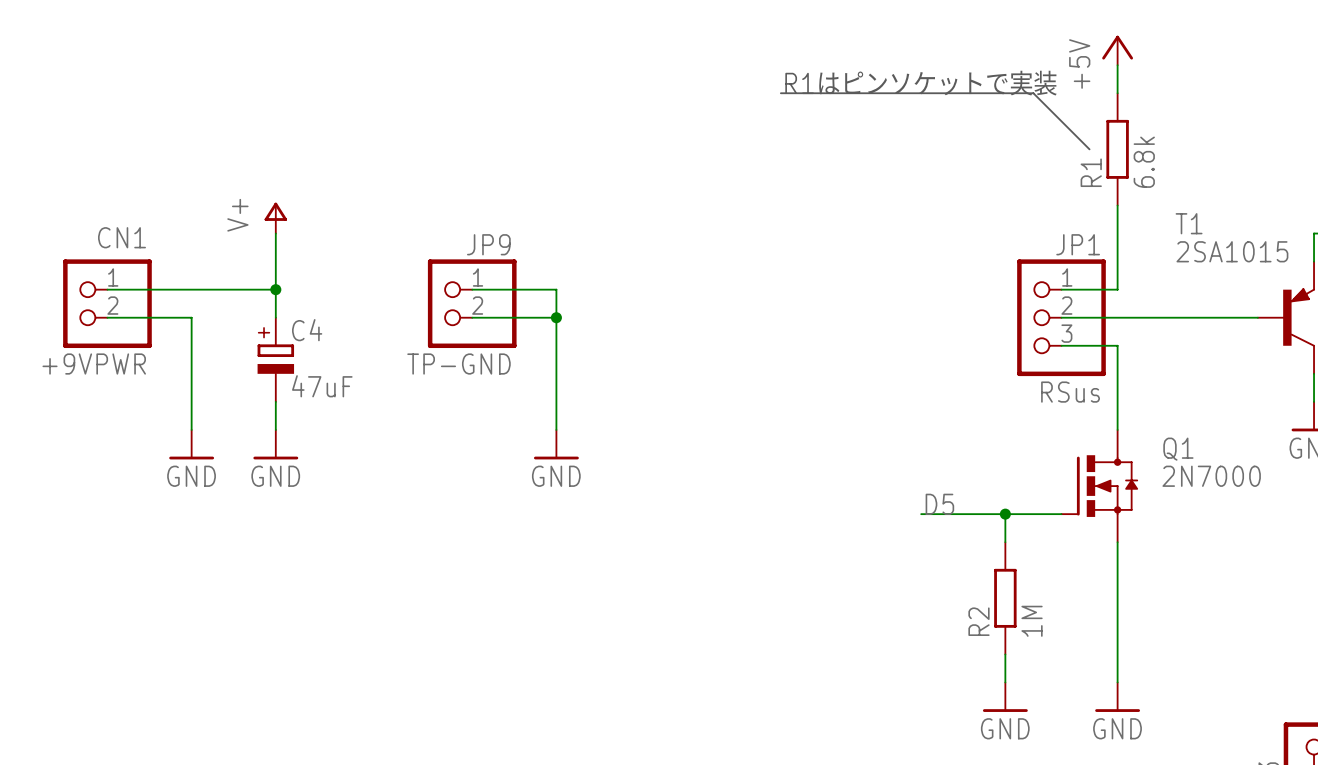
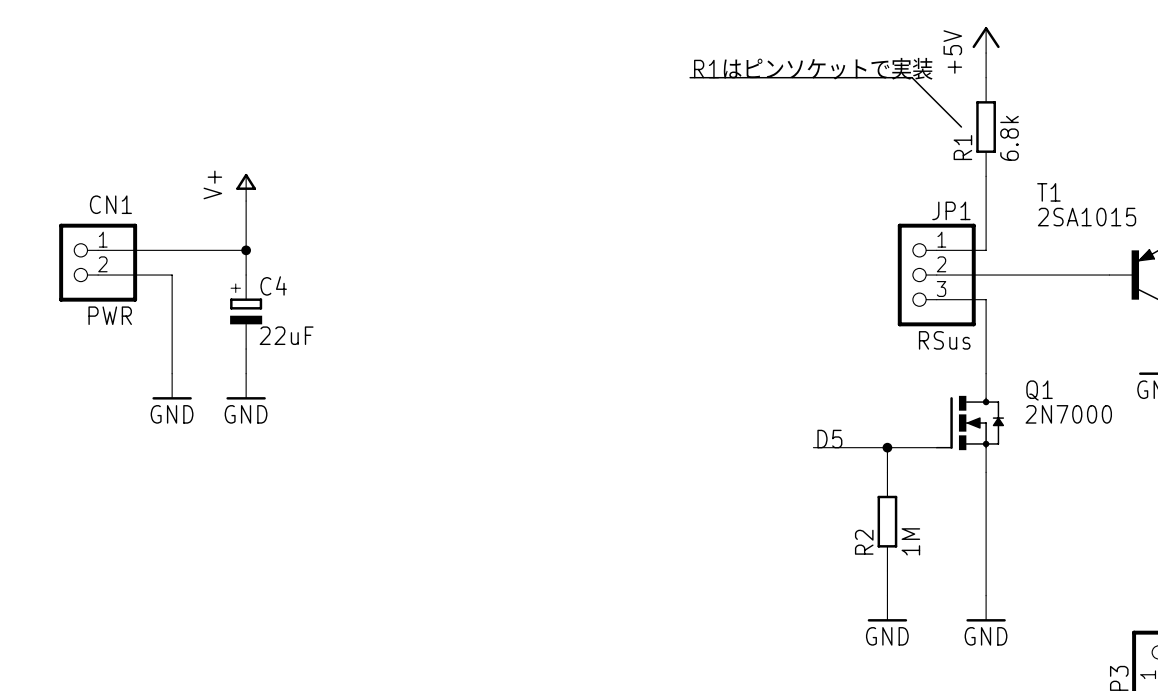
wire: (472, 289) (556, 289) (556, 429) -> none
JP9: TP-GND (472, 303) -> none
wire: (472, 317) (556, 317) -> none
junction: (556, 317) -> none
CN1 value: +9VPWR (94, 364) -> PWR (110, 315)
C4 value: 47uF (322, 386) -> 22uF (286, 335)
power symbol: GND (556, 444) -> none

